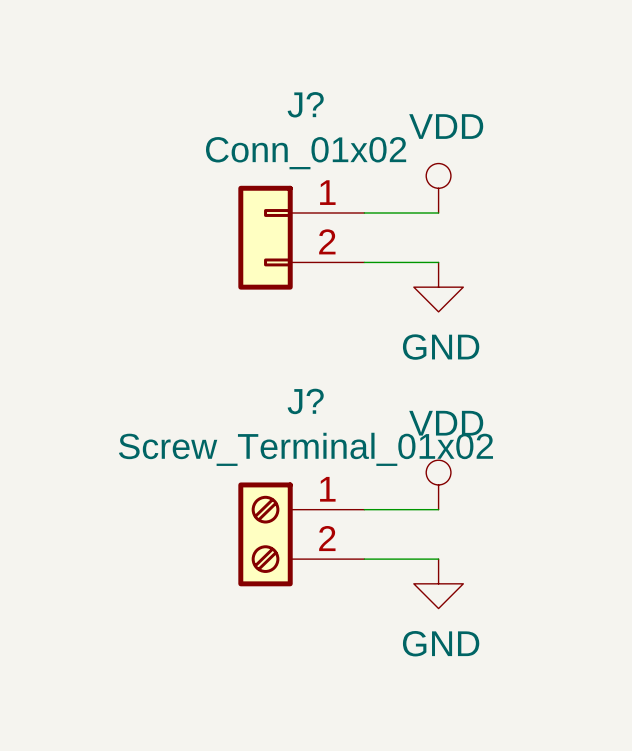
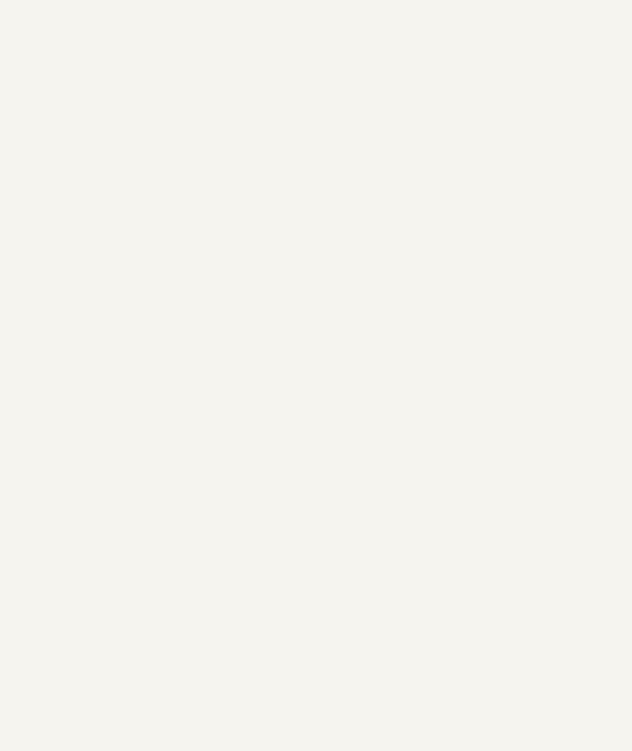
power symbol: VDD (438, 188) -> none
wire: (364, 212) (438, 212) -> none
J?: Conn_01x02 (301, 237) -> none
wire: (364, 262) (438, 262) -> none
power symbol: GND (438, 287) -> none
power symbol: VDD (438, 484) -> none
wire: (364, 509) (438, 509) -> none
J?: Screw_Terminal_01x02 (301, 534) -> none
wire: (364, 559) (438, 559) -> none
power symbol: GND (438, 583) -> none

